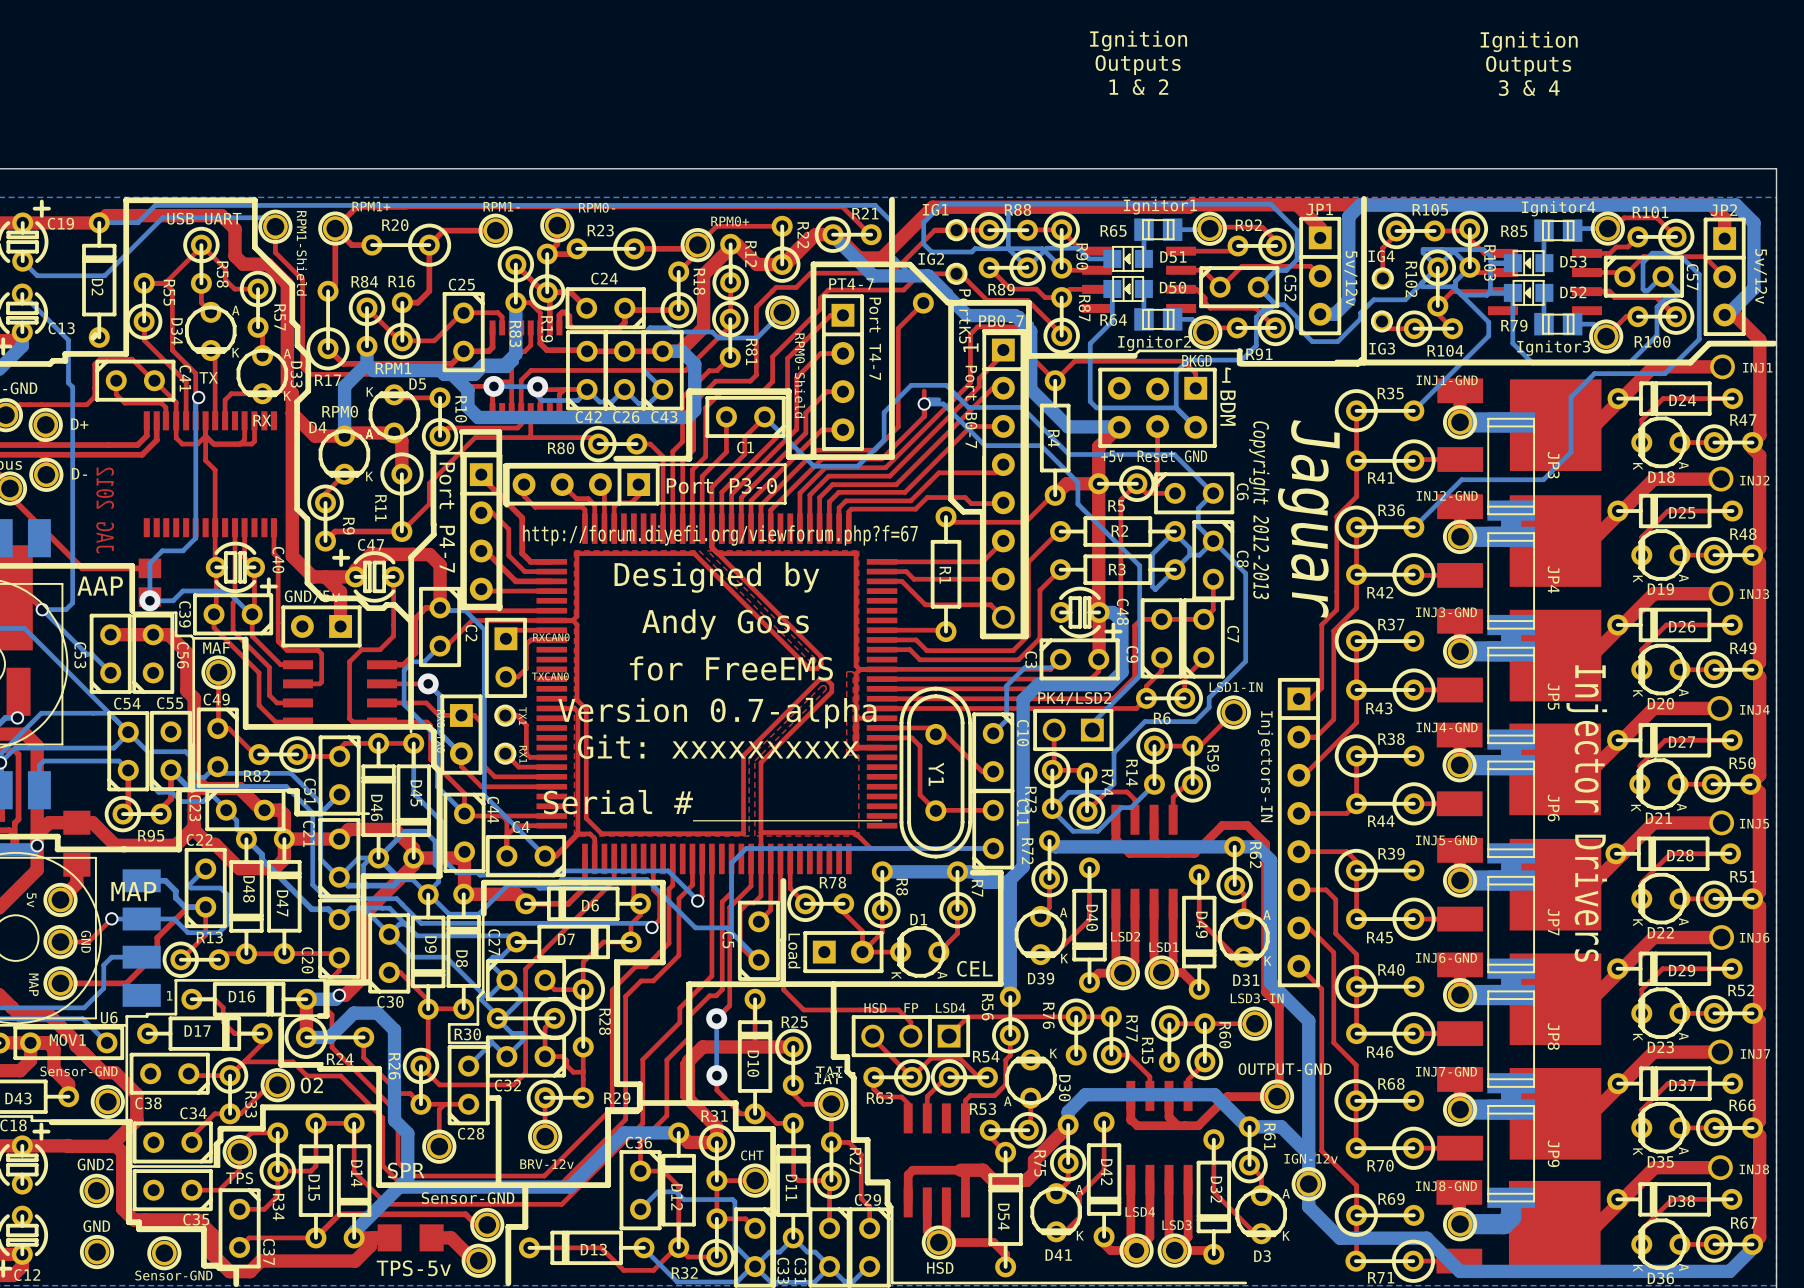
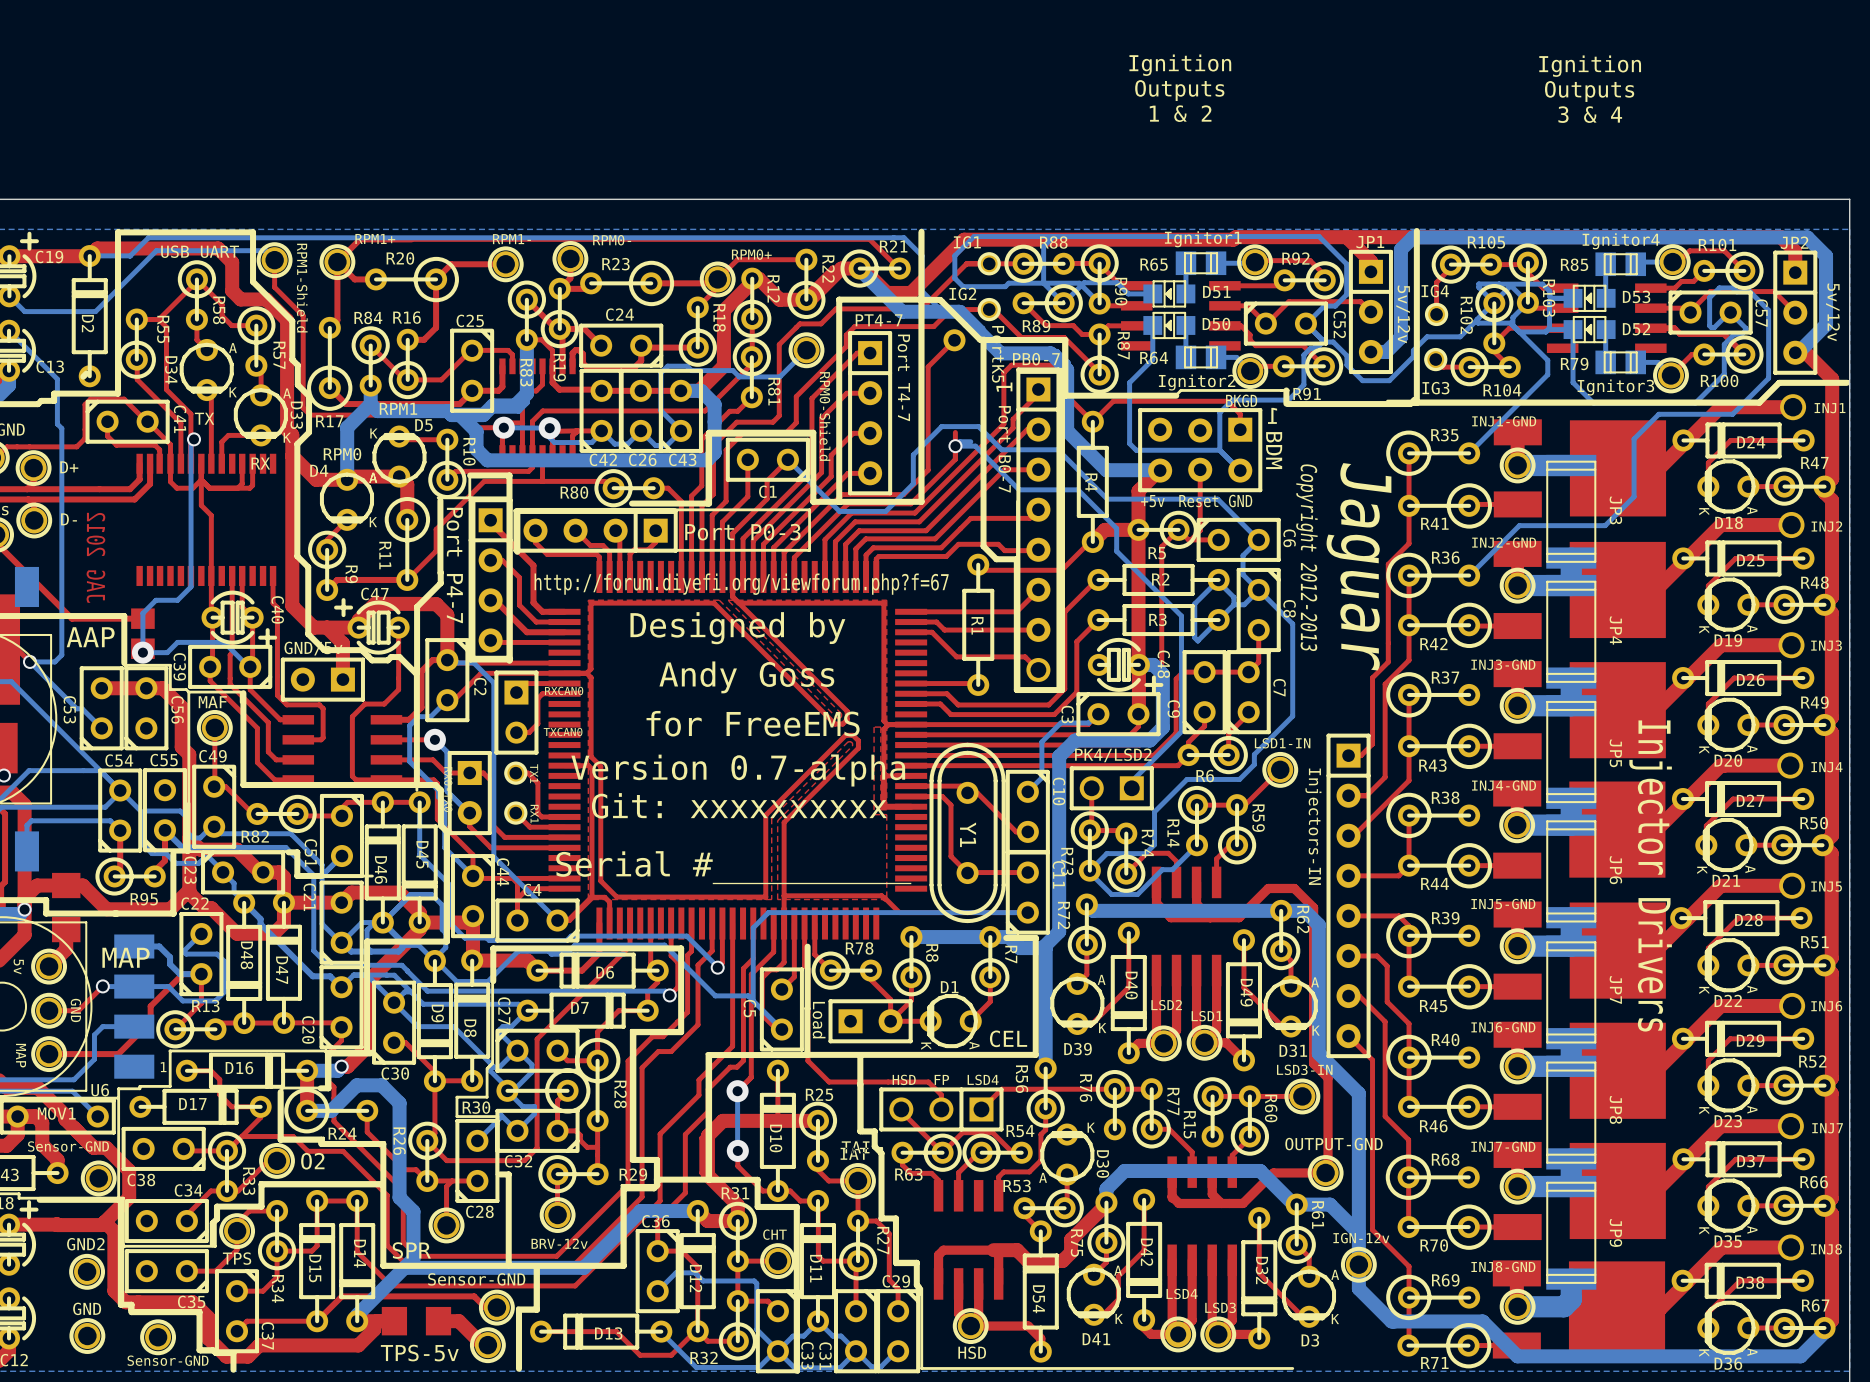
part value: Port P3-0 (721, 485) -> Port P0-3 (742, 532)

